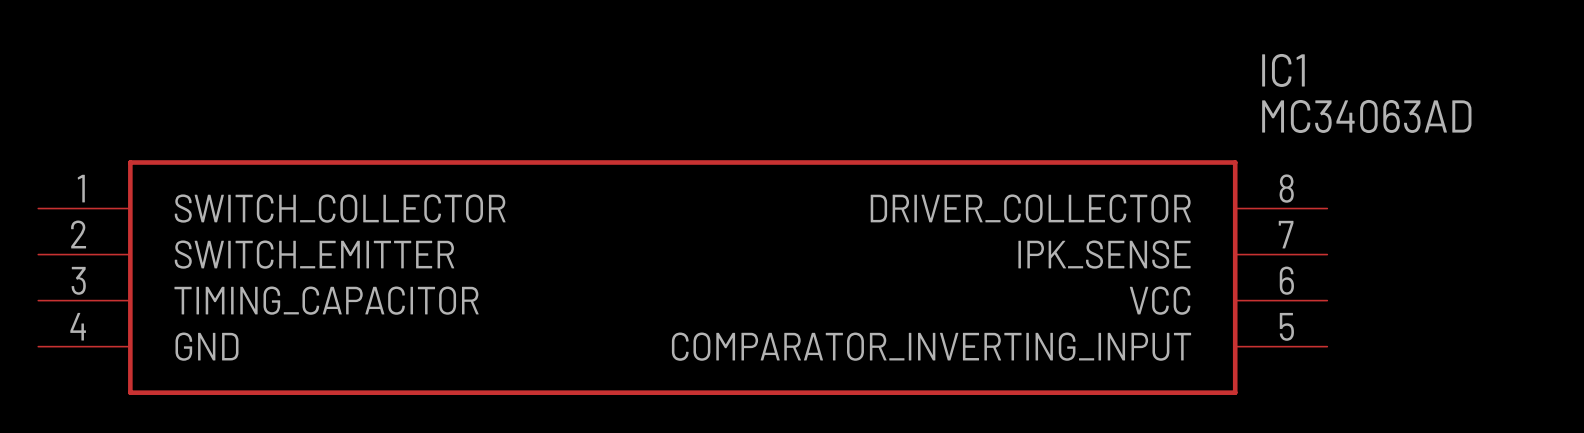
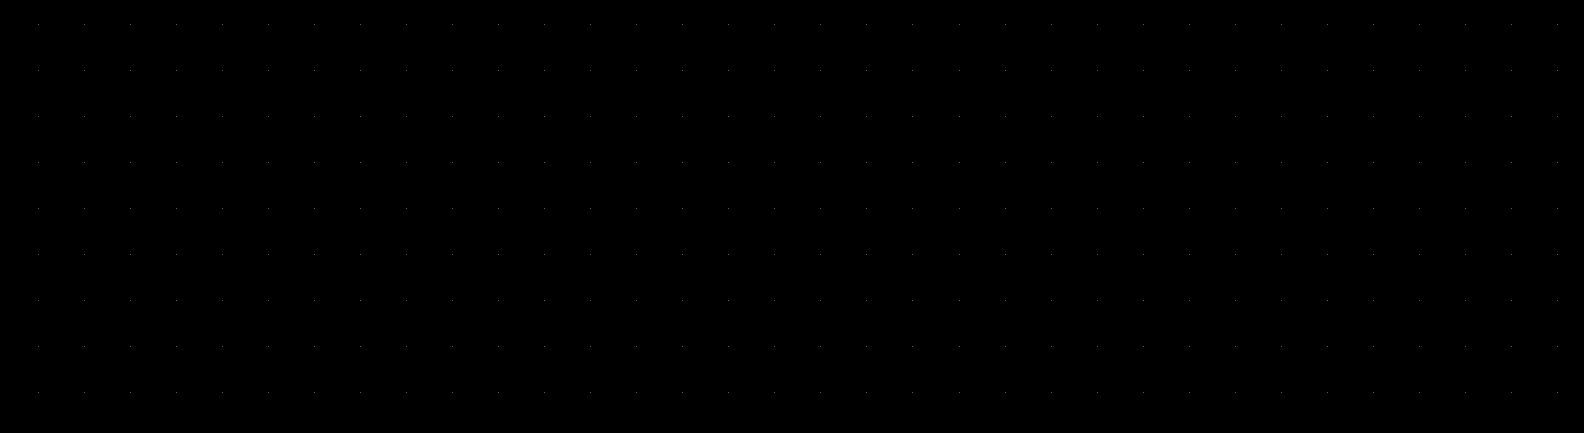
IC1: MC34063AD (682, 277) -> none

